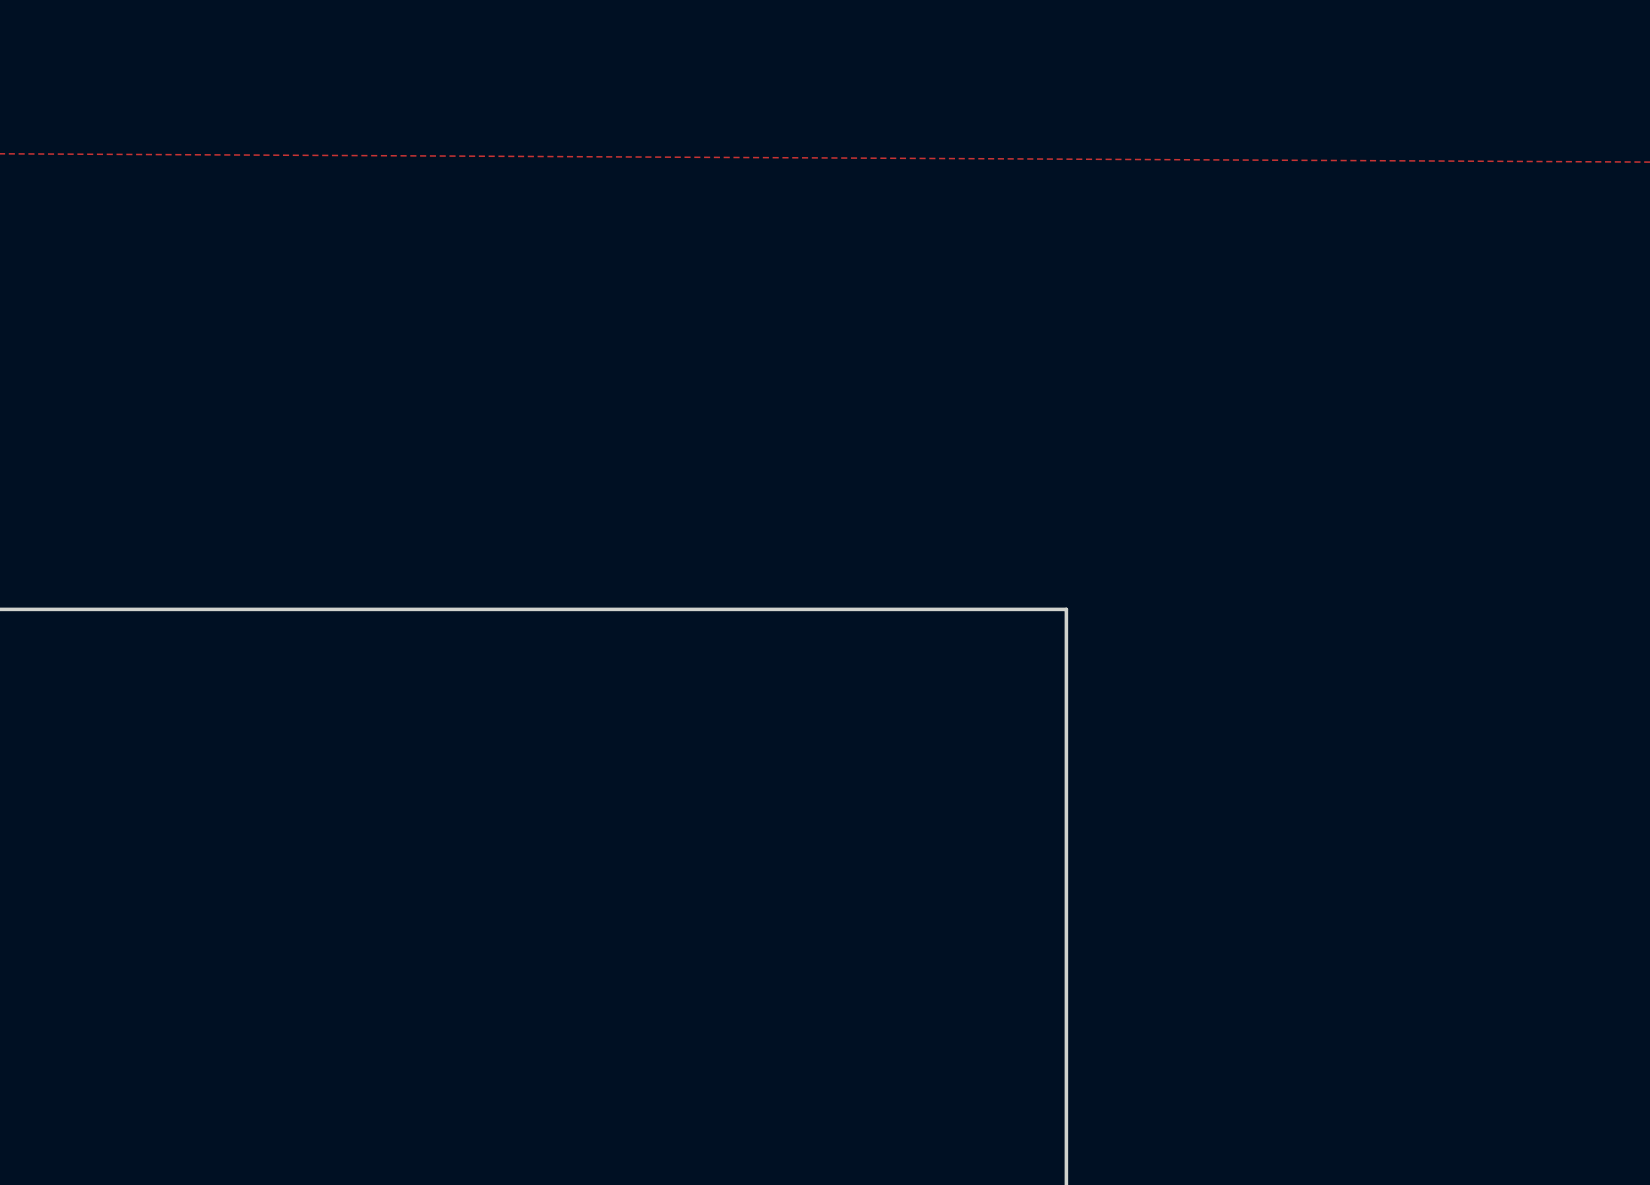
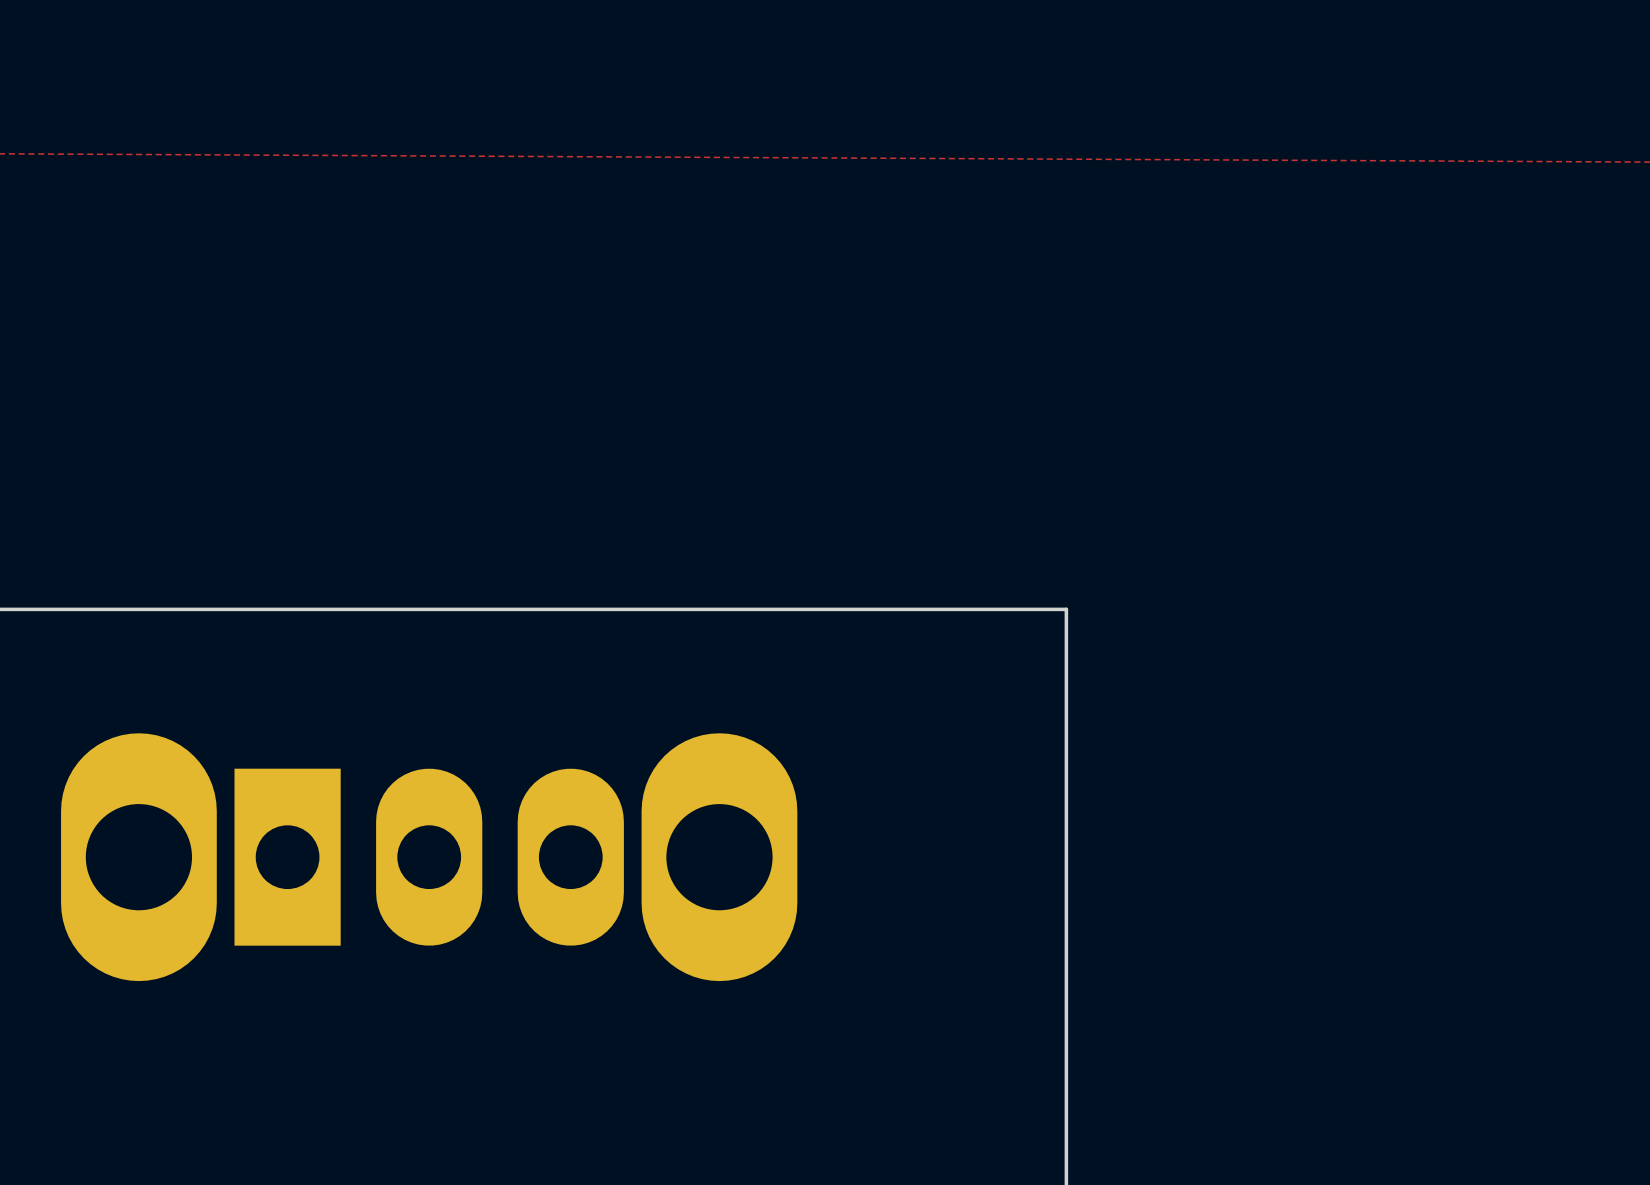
part: none -> (429, 857)

